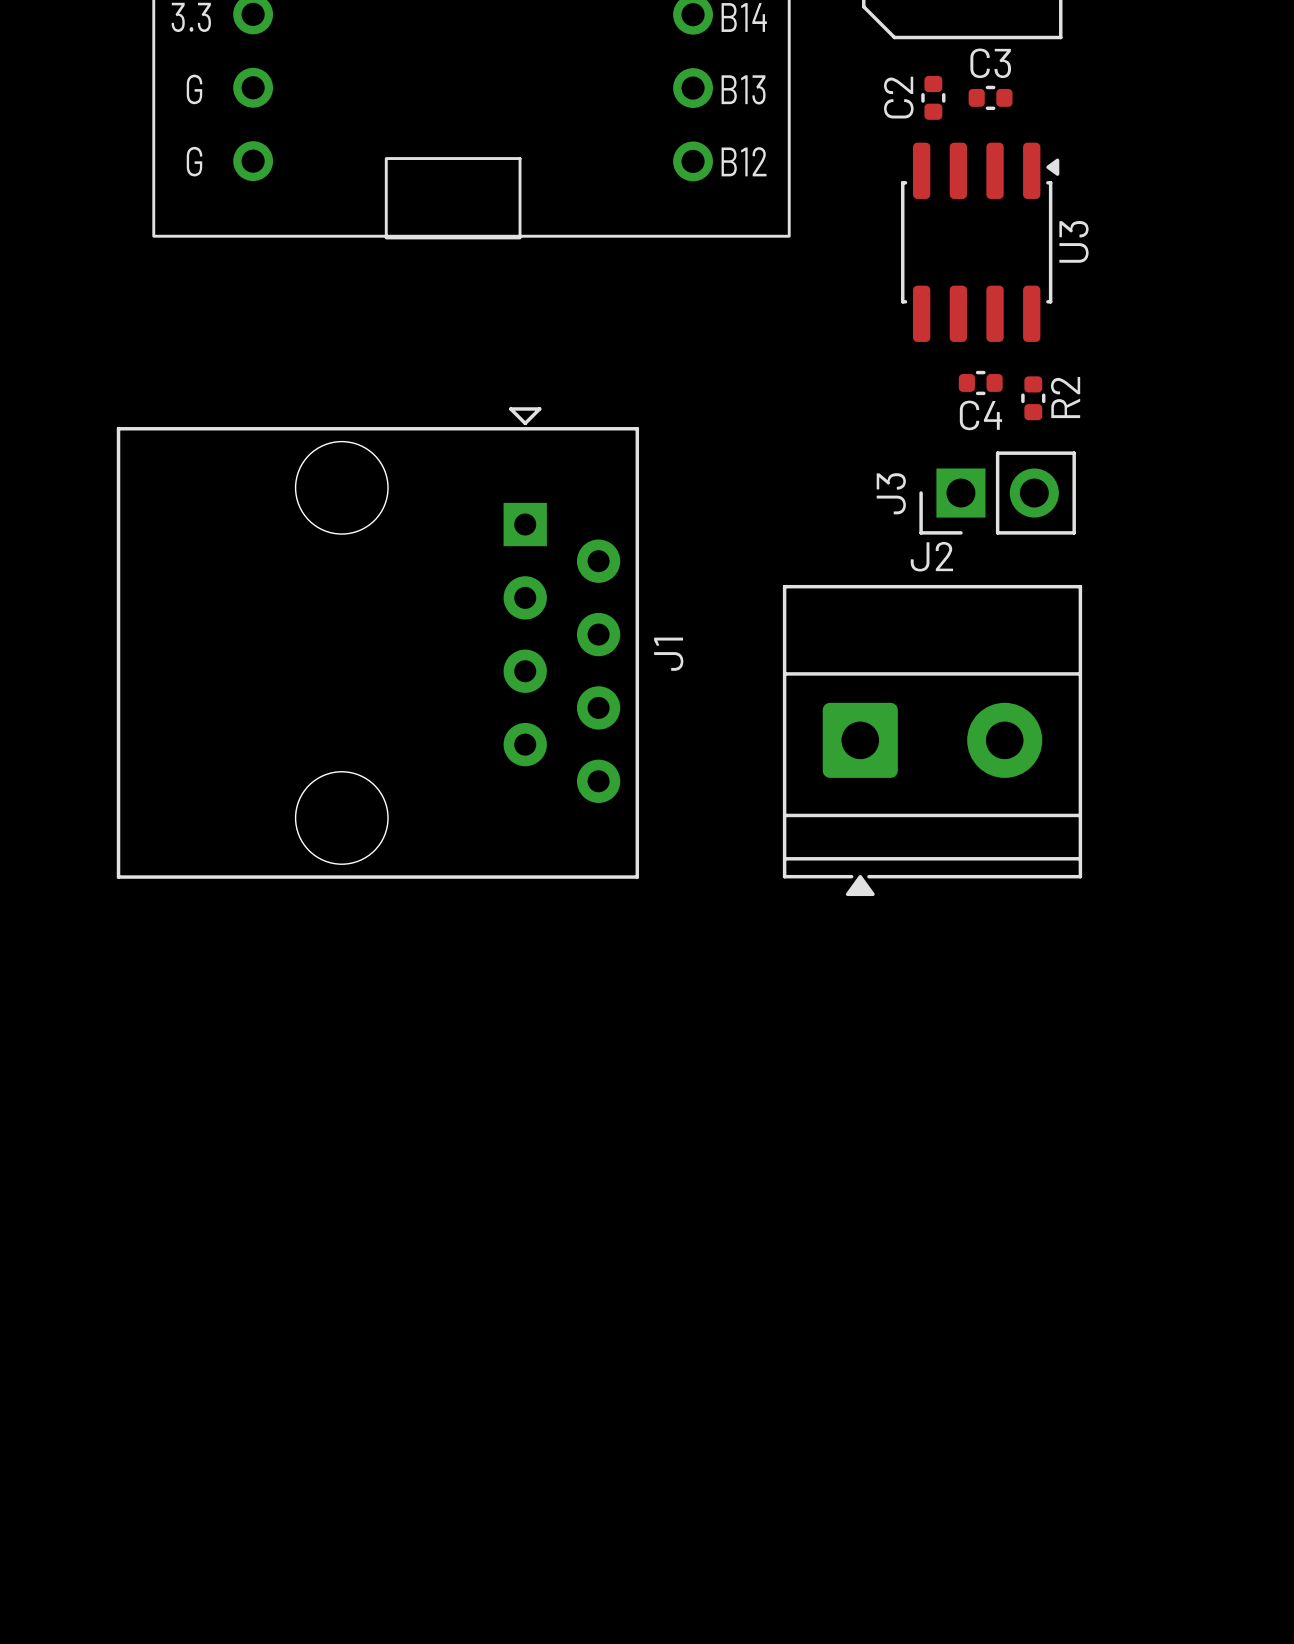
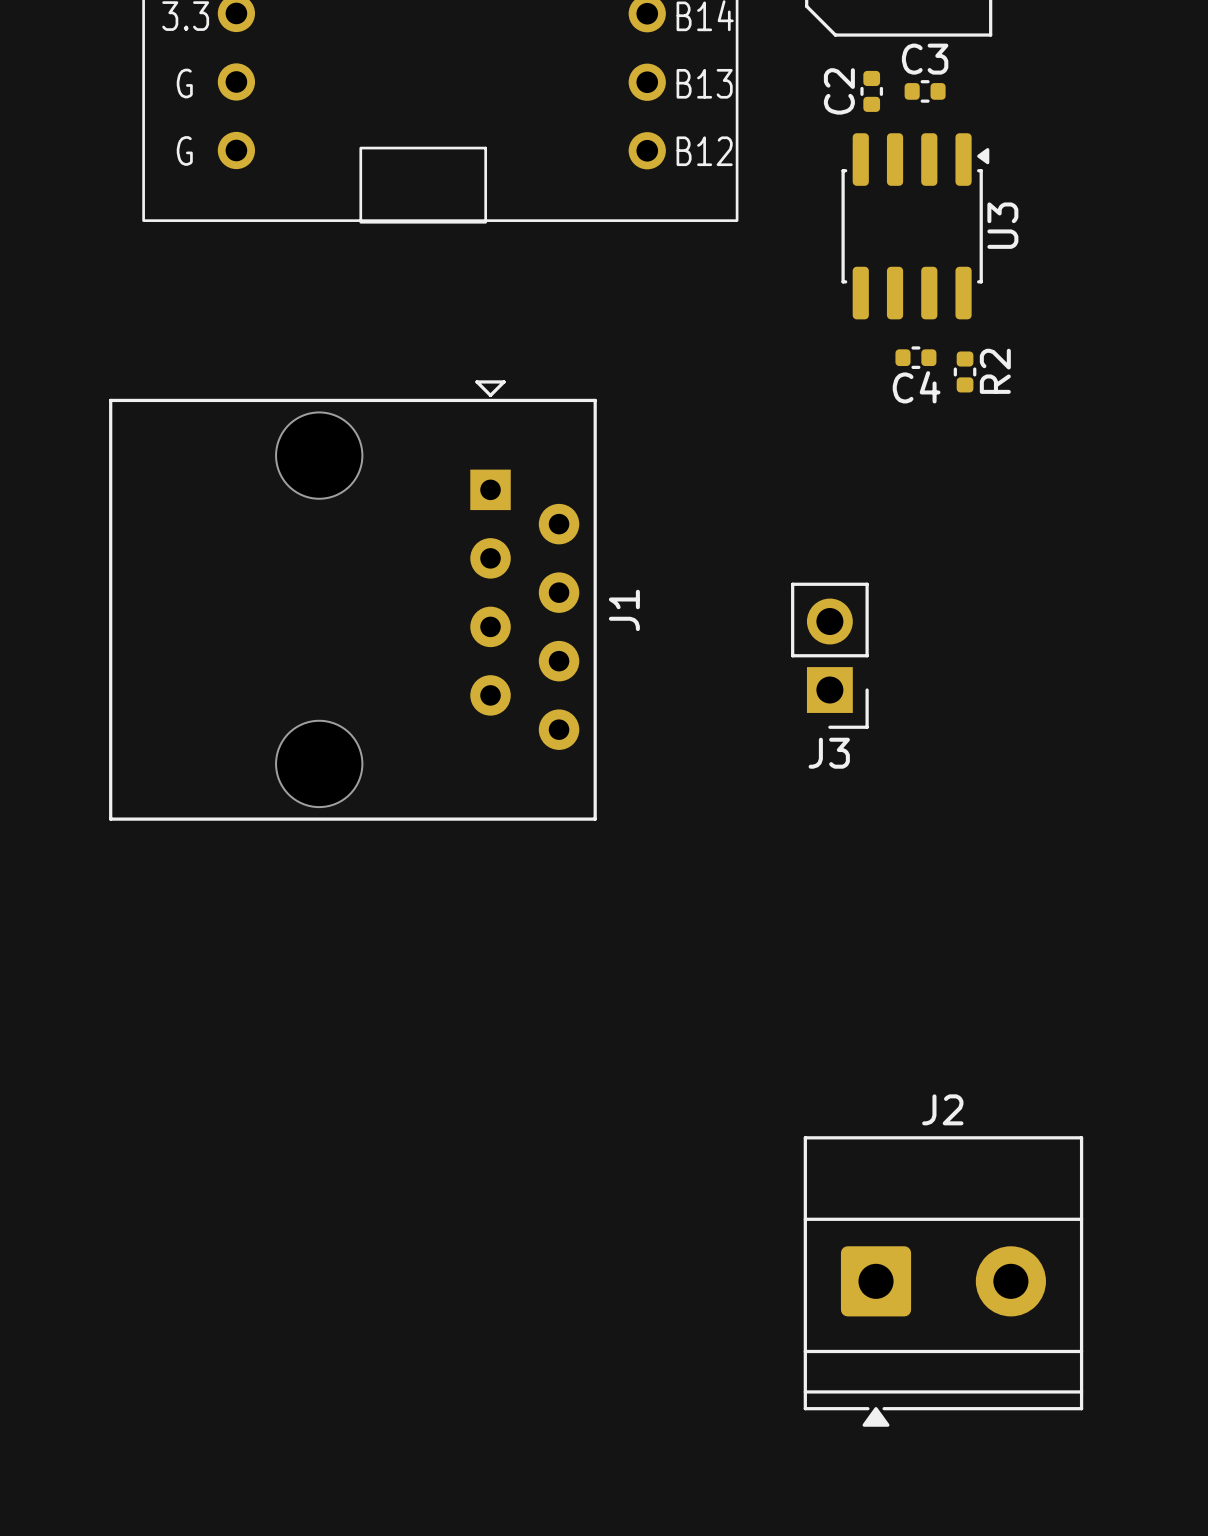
J3 rotation: 0° (997, 493) -> 90° counterclockwise (829, 655)
J3 position: (997, 493) -> (829, 655)
J2 position: (932, 740) -> (943, 1281)

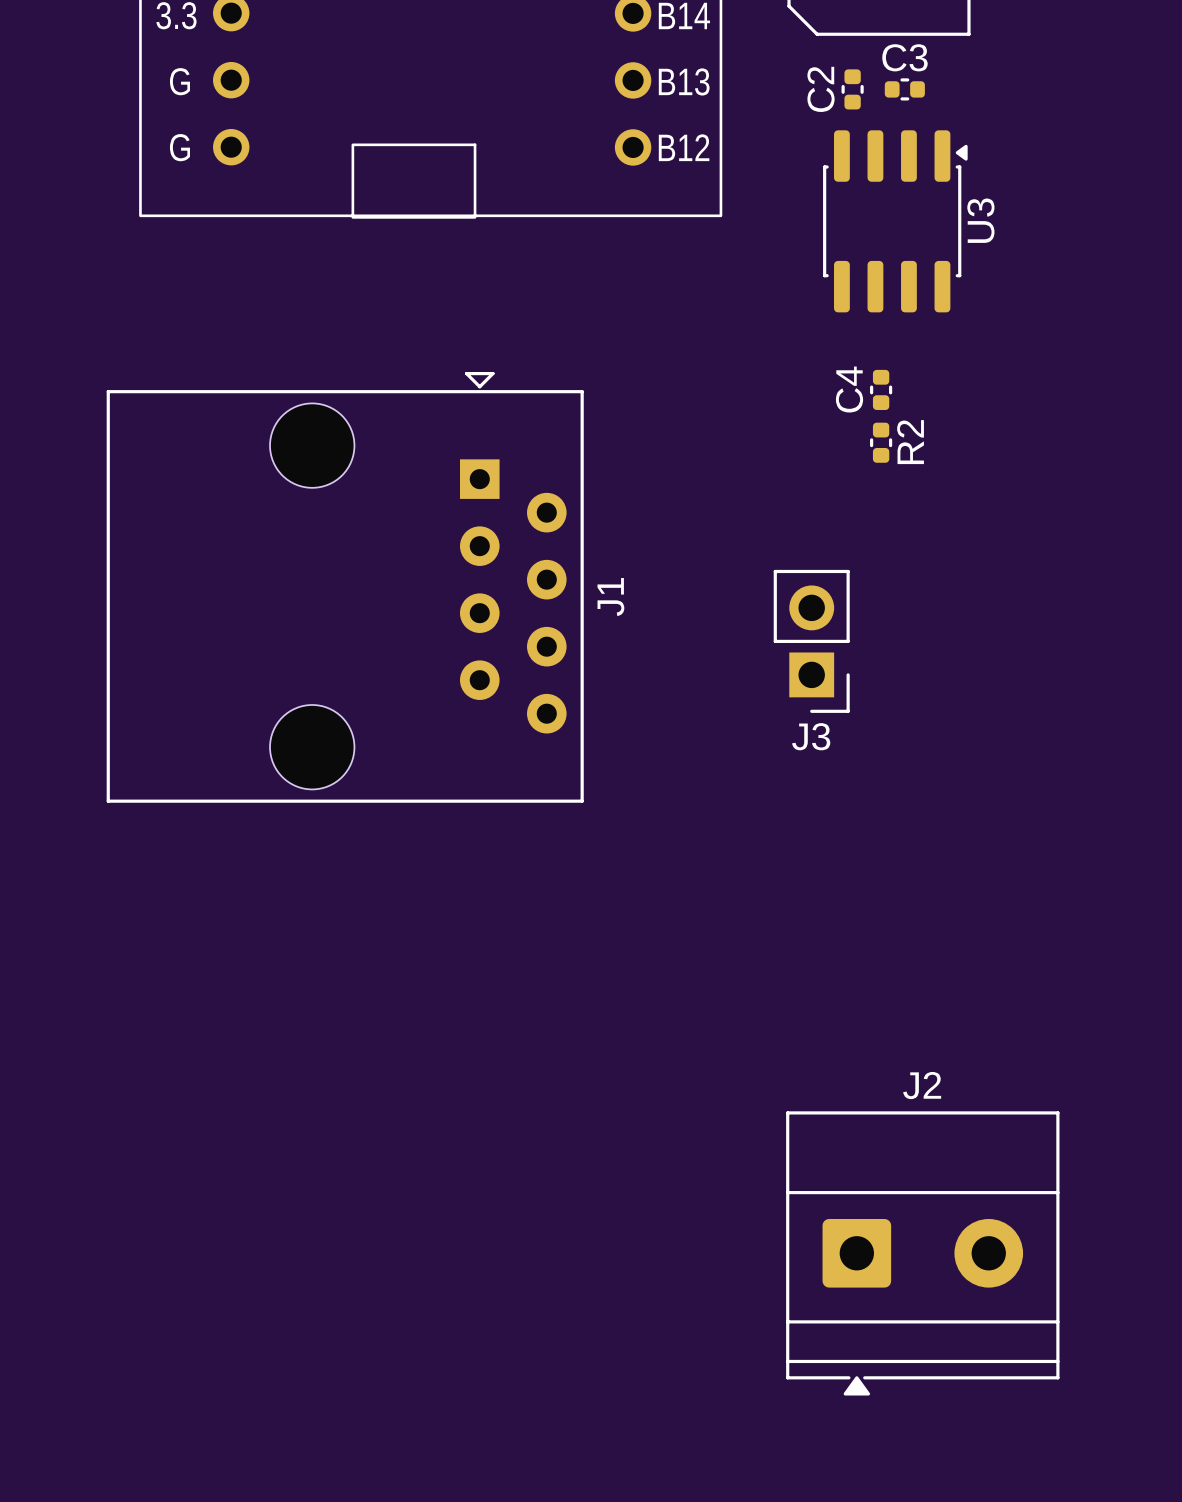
C4 rotation: 0° (915, 357) -> 90° clockwise (881, 389)
C4 position: (915, 357) -> (881, 389)
R2 position: (965, 371) -> (881, 442)

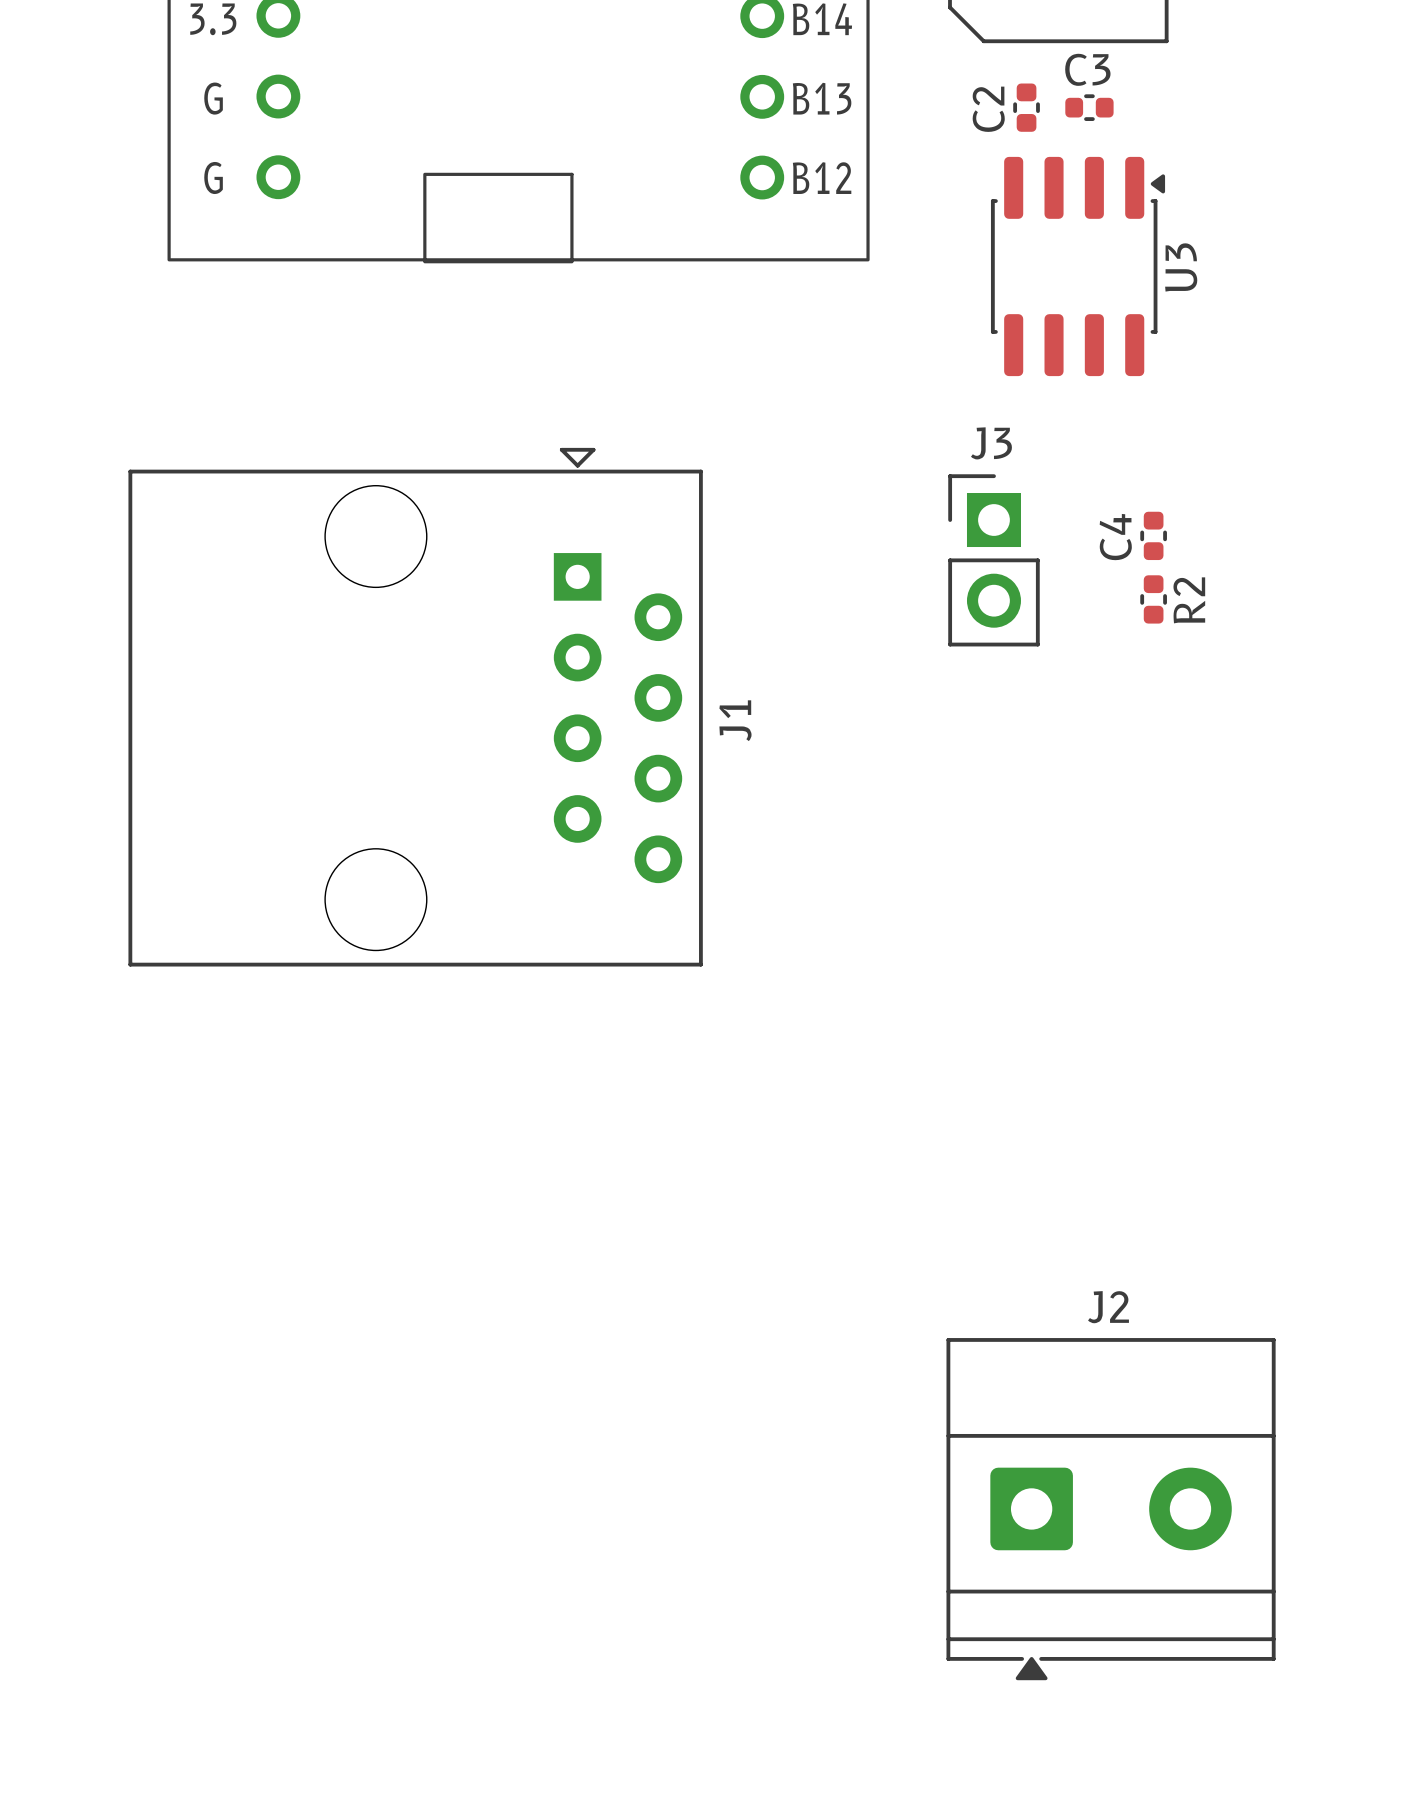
C4 position: (881, 389) -> (1153, 535)
R2 position: (881, 442) -> (1153, 599)
J3 rotation: 0° (811, 641) -> 180° (993, 560)
J3 position: (811, 641) -> (993, 560)

